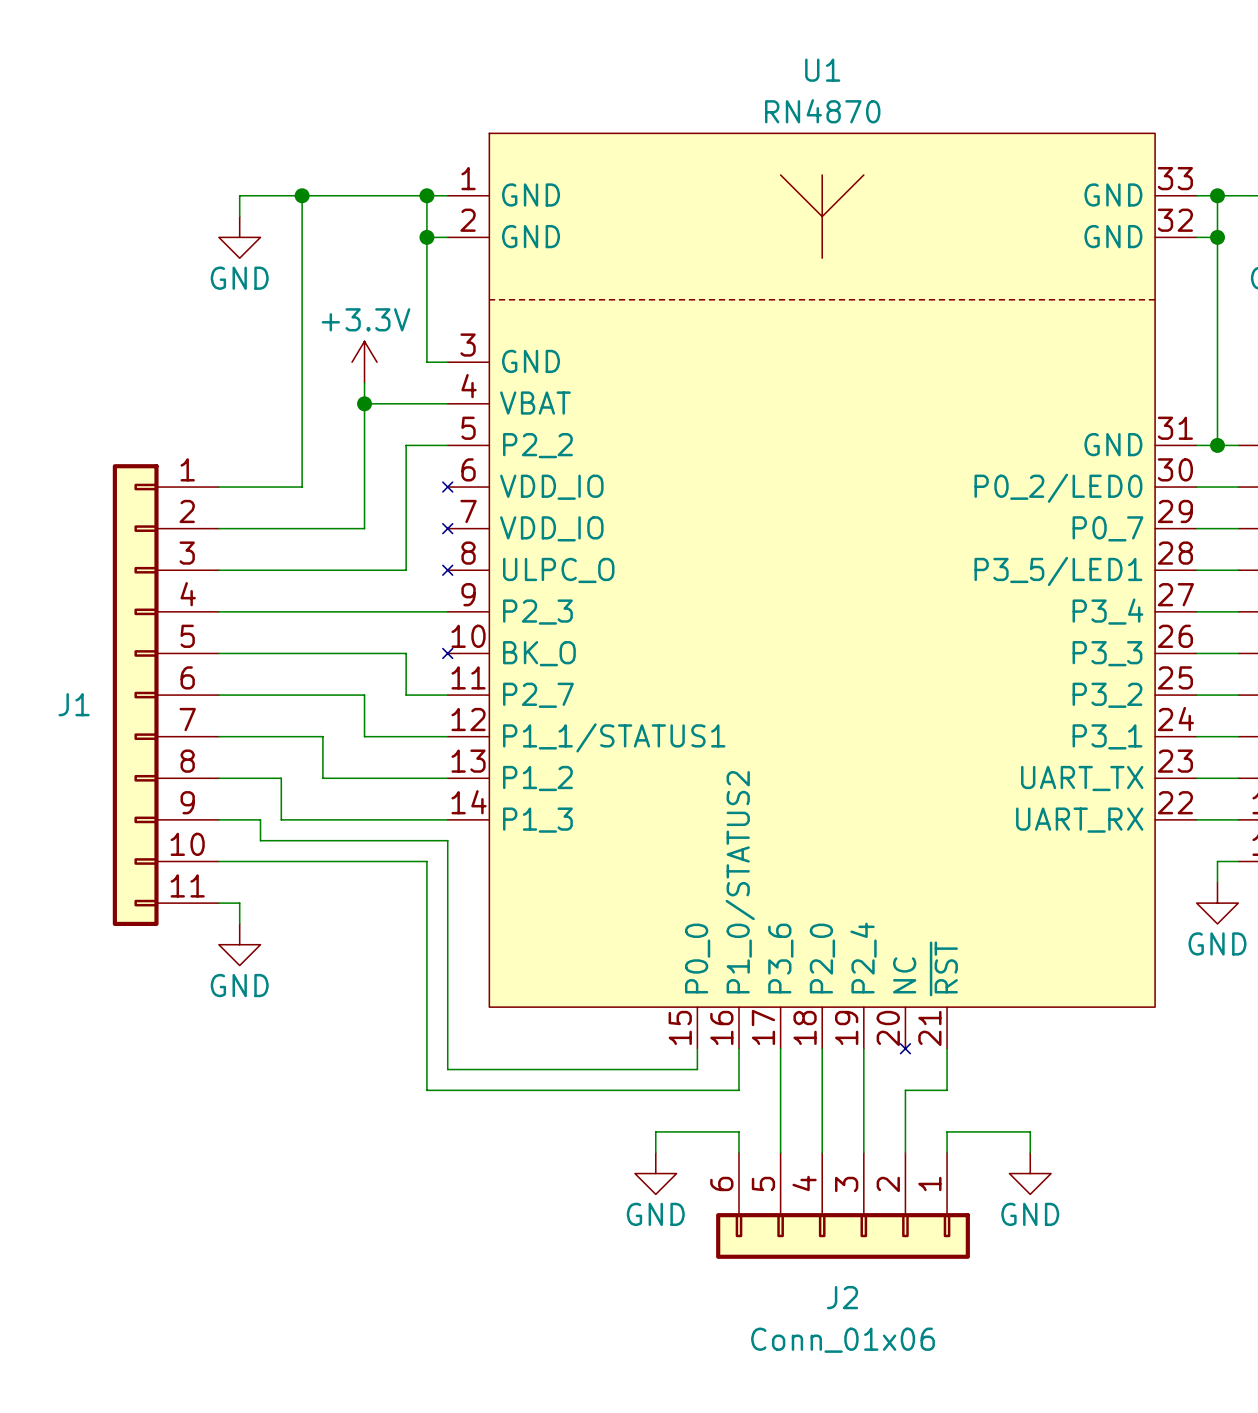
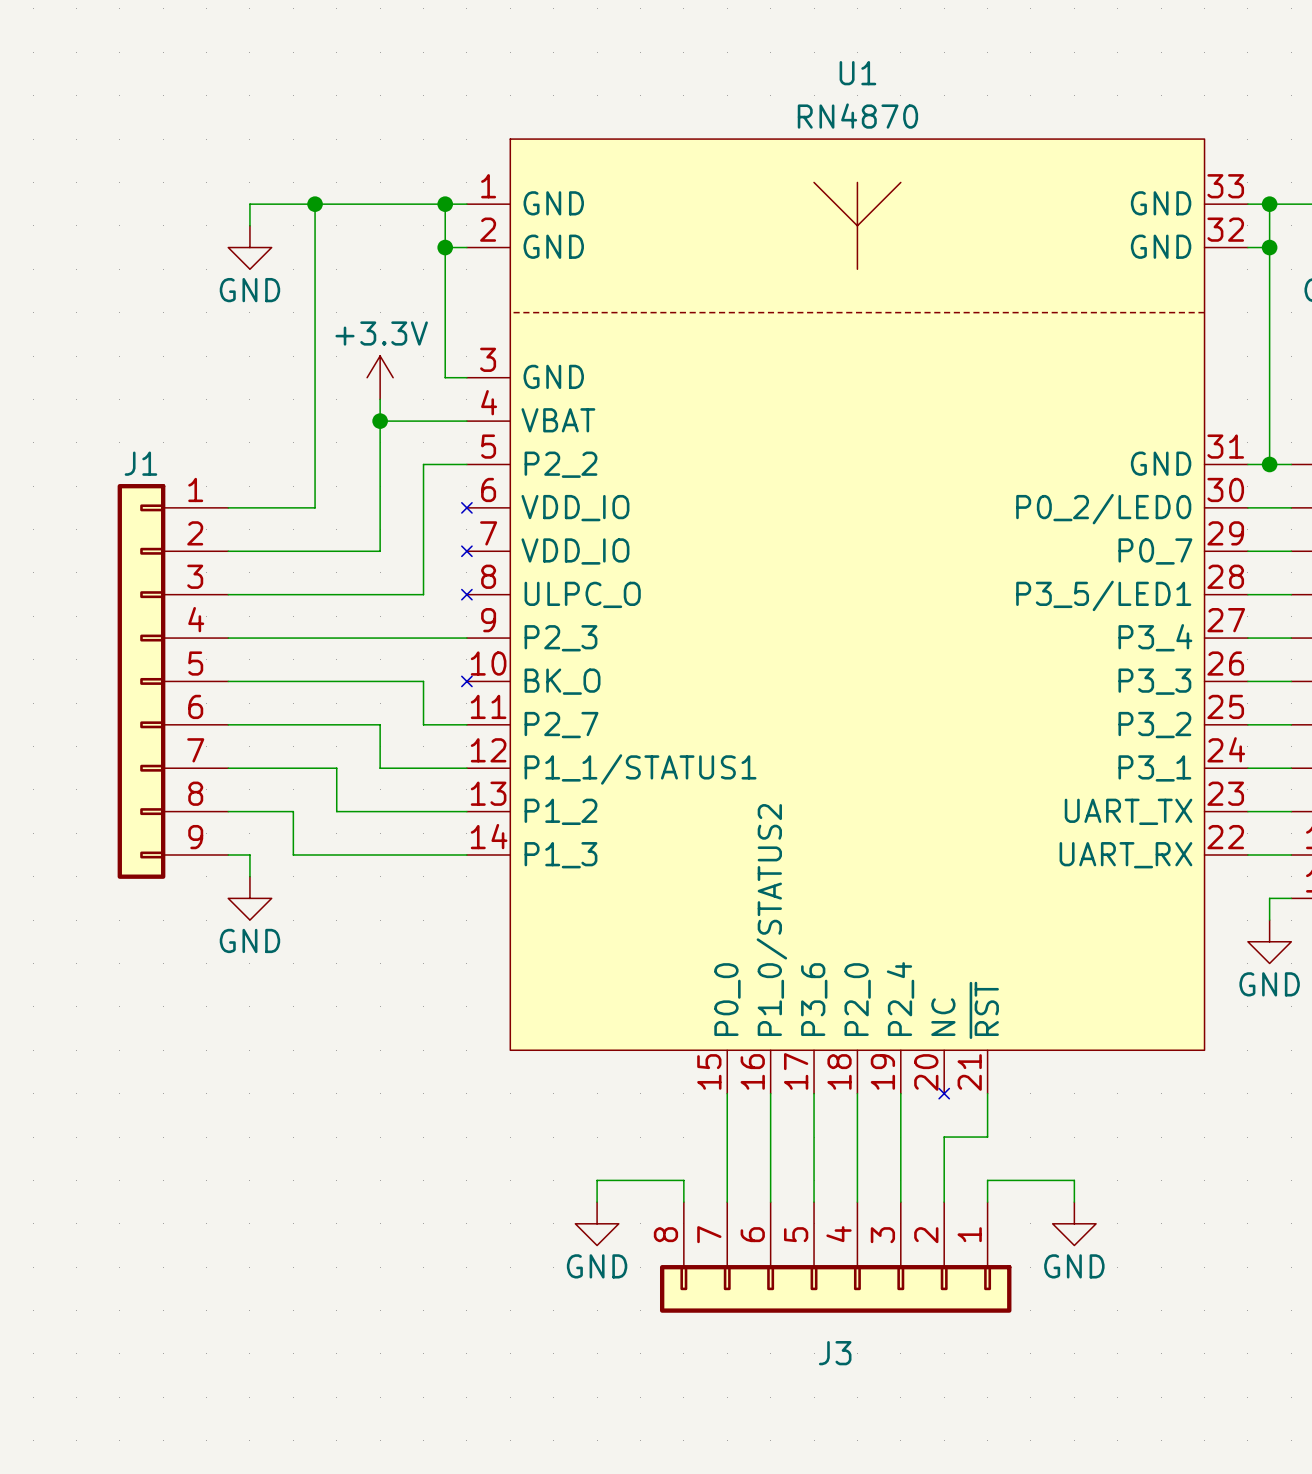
J1 symbol: [112, 464, 219, 926] -> [117, 484, 229, 879]
J1 name position: J1 (74, 704) -> J1 (140, 463)
wire: (239, 819) (260, 819) (260, 840) (447, 840) (447, 1069) (697, 1069) -> (249, 854) (249, 876)
wire: (218, 861) (426, 861) (426, 1090) (739, 1090) -> none
wire: (218, 903) (239, 903) (239, 923) -> none
power symbol position: GND (239, 944) -> GND (249, 898)
wire: none -> (727, 1115) (727, 1202)
wire: (655, 1131) (739, 1131) -> (770, 1137) (770, 1180)
wire: none -> (683, 1180) (597, 1180) (597, 1202)
power symbol position: GND (655, 1173) -> GND (597, 1223)
J3: none -> (835, 1257)
J2: Conn_01x06 (843, 1205) -> none

